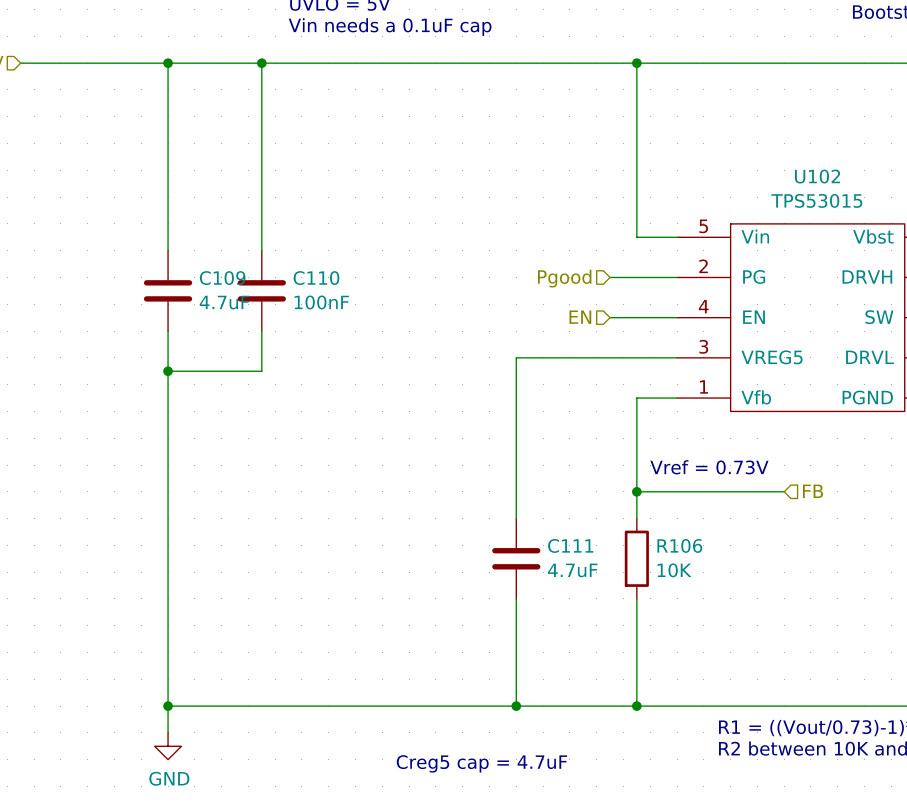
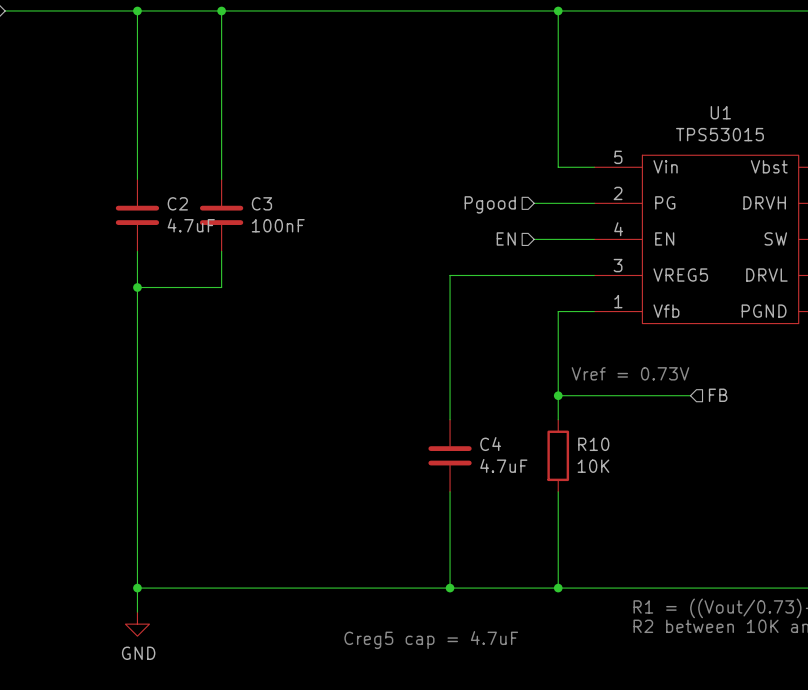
U102 name: U102 (817, 176) -> U1 (720, 112)
C109 name: C109 (222, 278) -> C2 (177, 203)
C110 name: C110 (316, 278) -> C3 (261, 203)
C111 name: C111 (570, 545) -> C4 (490, 444)
R106 name: R106 (679, 545) -> R10 (593, 444)

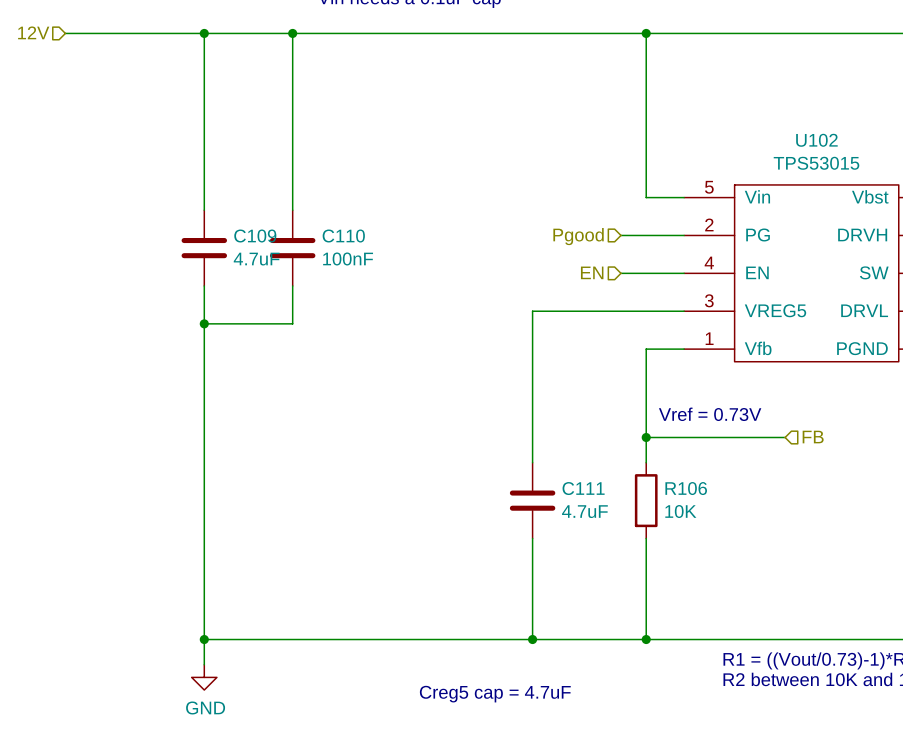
U1 name: U1 (720, 112) -> U102 (816, 140)
C2 name: C2 (177, 203) -> C109 (255, 236)
C3 name: C3 (261, 203) -> C110 (343, 236)
C4 name: C4 (490, 444) -> C111 (583, 488)
R10 name: R10 (593, 444) -> R106 (686, 488)

